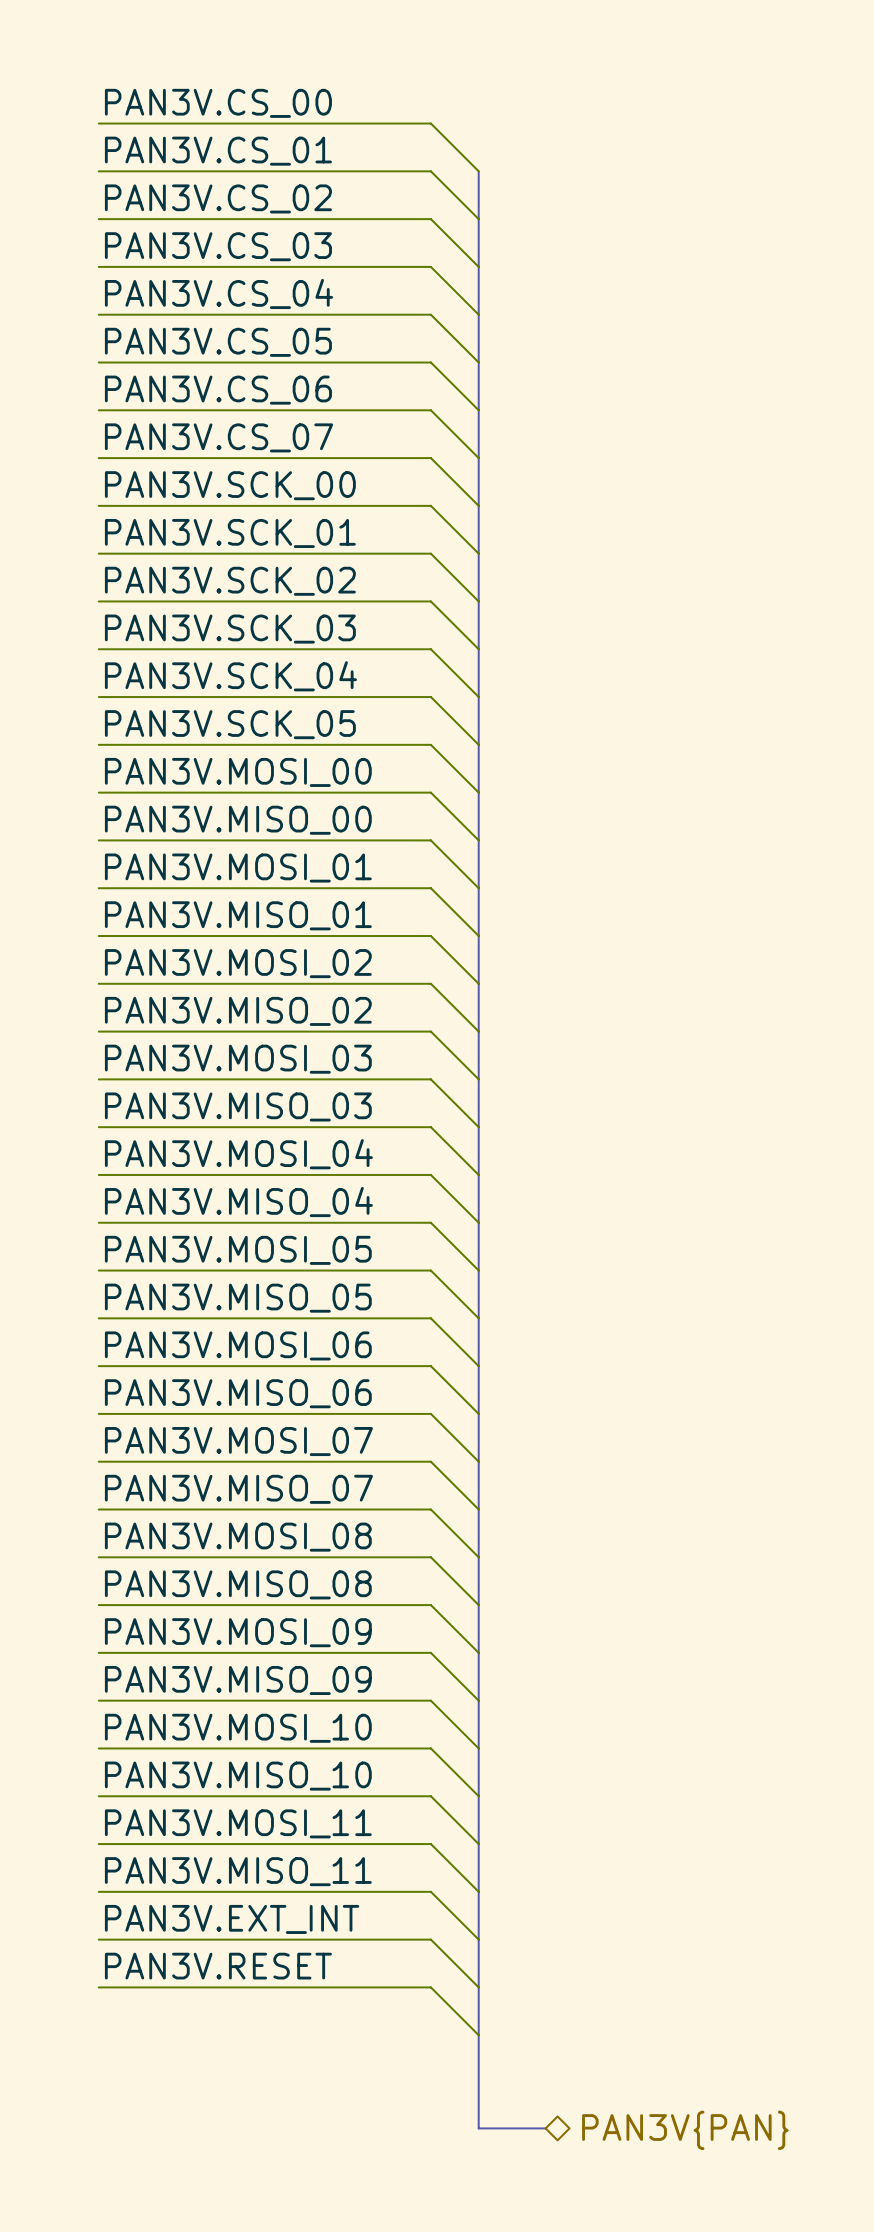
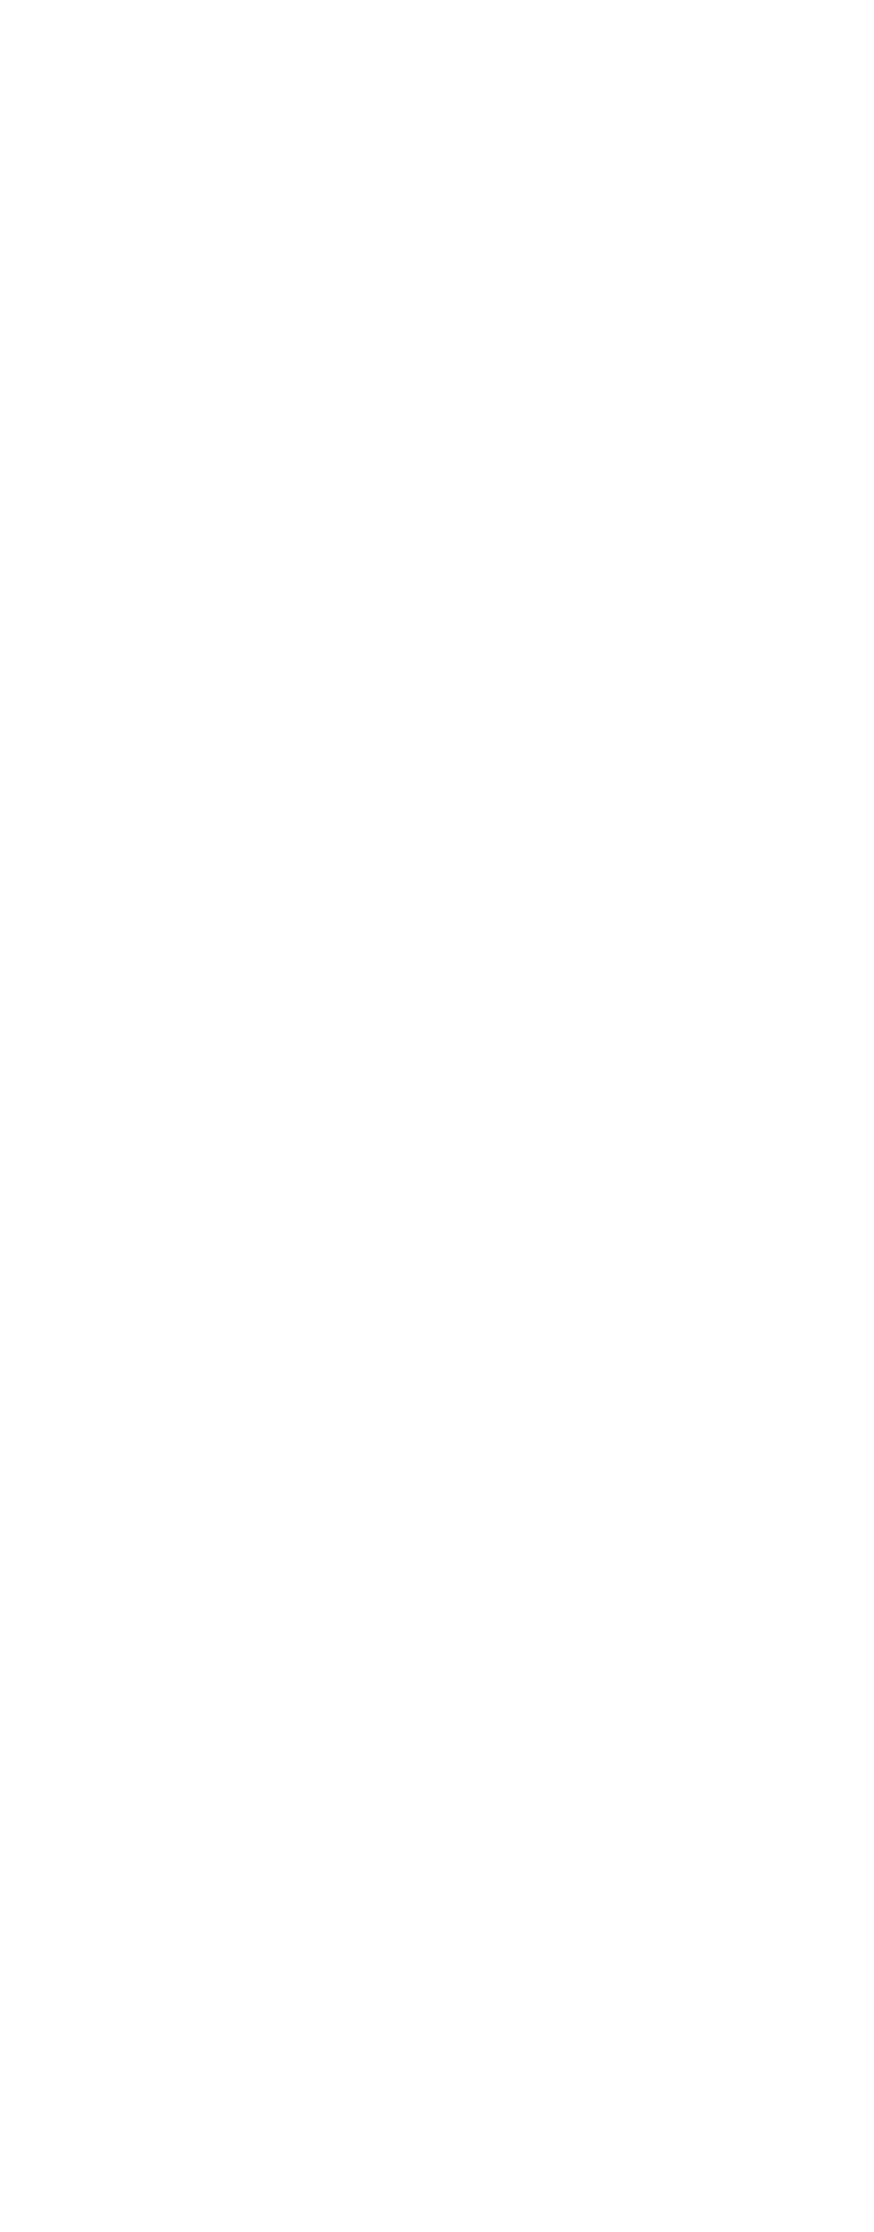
label: PAN3V.CS_00 (218, 103) -> none
wire: (98, 123) (430, 123) (478, 171) -> none
label: PAN3V.CS_01 (218, 151) -> none
wire: (98, 171) (430, 171) (478, 219) -> none
bus: (478, 171) (478, 2128) (545, 2128) -> none
label: PAN3V.CS_02 (218, 198) -> none
wire: (98, 219) (430, 219) (478, 266) -> none
label: PAN3V.CS_03 (218, 246) -> none
wire: (98, 266) (430, 266) (478, 314) -> none
label: PAN3V.CS_04 (218, 293) -> none
wire: (98, 314) (430, 314) (478, 362) -> none
label: PAN3V.CS_05 (218, 342) -> none
wire: (98, 362) (430, 362) (478, 410) -> none
label: PAN3V.CS_06 (218, 390) -> none
wire: (98, 410) (430, 410) (478, 458) -> none
label: PAN3V.CS_07 (218, 437) -> none
wire: (98, 458) (430, 458) (478, 505) -> none
label: PAN3V.SCK_00 (230, 485) -> none
wire: (98, 505) (430, 505) (478, 553) -> none
label: PAN3V.SCK_01 (230, 533) -> none
wire: (98, 553) (430, 553) (478, 601) -> none
label: PAN3V.SCK_02 (230, 581) -> none
wire: (98, 601) (430, 601) (478, 649) -> none
label: PAN3V.SCK_03 (230, 629) -> none
wire: (98, 649) (430, 649) (478, 697) -> none
label: PAN3V.SCK_04 (230, 676) -> none
wire: (98, 697) (430, 697) (478, 744) -> none
label: PAN3V.SCK_05 (230, 724) -> none
wire: (98, 744) (430, 744) (478, 792) -> none
label: PAN3V.MOSI_00 (238, 772) -> none
wire: (98, 792) (430, 792) (478, 840) -> none
label: PAN3V.MISO_00 (238, 820) -> none
wire: (98, 840) (430, 840) (478, 888) -> none
label: PAN3V.MOSI_01 (238, 868) -> none
wire: (98, 888) (430, 888) (478, 936) -> none
label: PAN3V.MISO_01 (238, 915) -> none
wire: (98, 936) (430, 936) (478, 983) -> none
label: PAN3V.MOSI_02 (238, 963) -> none
wire: (98, 983) (430, 983) (478, 1031) -> none
label: PAN3V.MISO_02 (238, 1011) -> none
wire: (98, 1031) (430, 1031) (478, 1079) -> none
label: PAN3V.MOSI_03 (238, 1059) -> none
wire: (98, 1079) (430, 1079) (478, 1127) -> none
label: PAN3V.MISO_03 (238, 1106) -> none
wire: (98, 1127) (430, 1127) (478, 1174) -> none
label: PAN3V.MOSI_04 (238, 1154) -> none
wire: (98, 1174) (430, 1174) (478, 1222) -> none
label: PAN3V.MISO_04 (238, 1202) -> none
wire: (98, 1222) (430, 1222) (478, 1270) -> none
label: PAN3V.MOSI_05 (238, 1250) -> none
wire: (98, 1270) (430, 1270) (478, 1318) -> none
label: PAN3V.MISO_05 (238, 1298) -> none
wire: (98, 1318) (430, 1318) (478, 1366) -> none
label: PAN3V.MOSI_06 (238, 1345) -> none
wire: (98, 1366) (430, 1366) (478, 1413) -> none
label: PAN3V.MISO_06 (238, 1393) -> none
wire: (98, 1413) (430, 1413) (478, 1461) -> none
label: PAN3V.MOSI_07 (238, 1441) -> none
wire: (98, 1461) (430, 1461) (478, 1509) -> none
label: PAN3V.MISO_07 (238, 1489) -> none
wire: (98, 1509) (430, 1509) (478, 1557) -> none
label: PAN3V.MOSI_08 (238, 1537) -> none
wire: (98, 1557) (430, 1557) (478, 1605) -> none
label: PAN3V.MISO_08 (238, 1584) -> none
wire: (98, 1605) (430, 1605) (478, 1652) -> none
label: PAN3V.MOSI_09 (238, 1632) -> none
wire: (98, 1652) (430, 1652) (478, 1700) -> none
label: PAN3V.MISO_09 (238, 1680) -> none
wire: (98, 1700) (430, 1700) (478, 1748) -> none
label: PAN3V.MOSI_10 (238, 1728) -> none
wire: (98, 1748) (430, 1748) (478, 1796) -> none
label: PAN3V.MISO_10 (238, 1776) -> none
wire: (98, 1796) (430, 1796) (478, 1844) -> none
label: PAN3V.MOSI_11 (238, 1823) -> none
wire: (98, 1844) (430, 1844) (478, 1891) -> none
label: PAN3V.MISO_11 (238, 1871) -> none
wire: (98, 1891) (430, 1891) (478, 1939) -> none
label: PAN3V.EXT_INT (232, 1919) -> none
wire: (98, 1939) (430, 1939) (478, 1987) -> none
label: PAN3V.RESET (218, 1966) -> none
wire: (98, 1987) (430, 1987) (478, 2035) -> none
hierarchical label: PAN3V{PAN} (685, 2130) -> none

